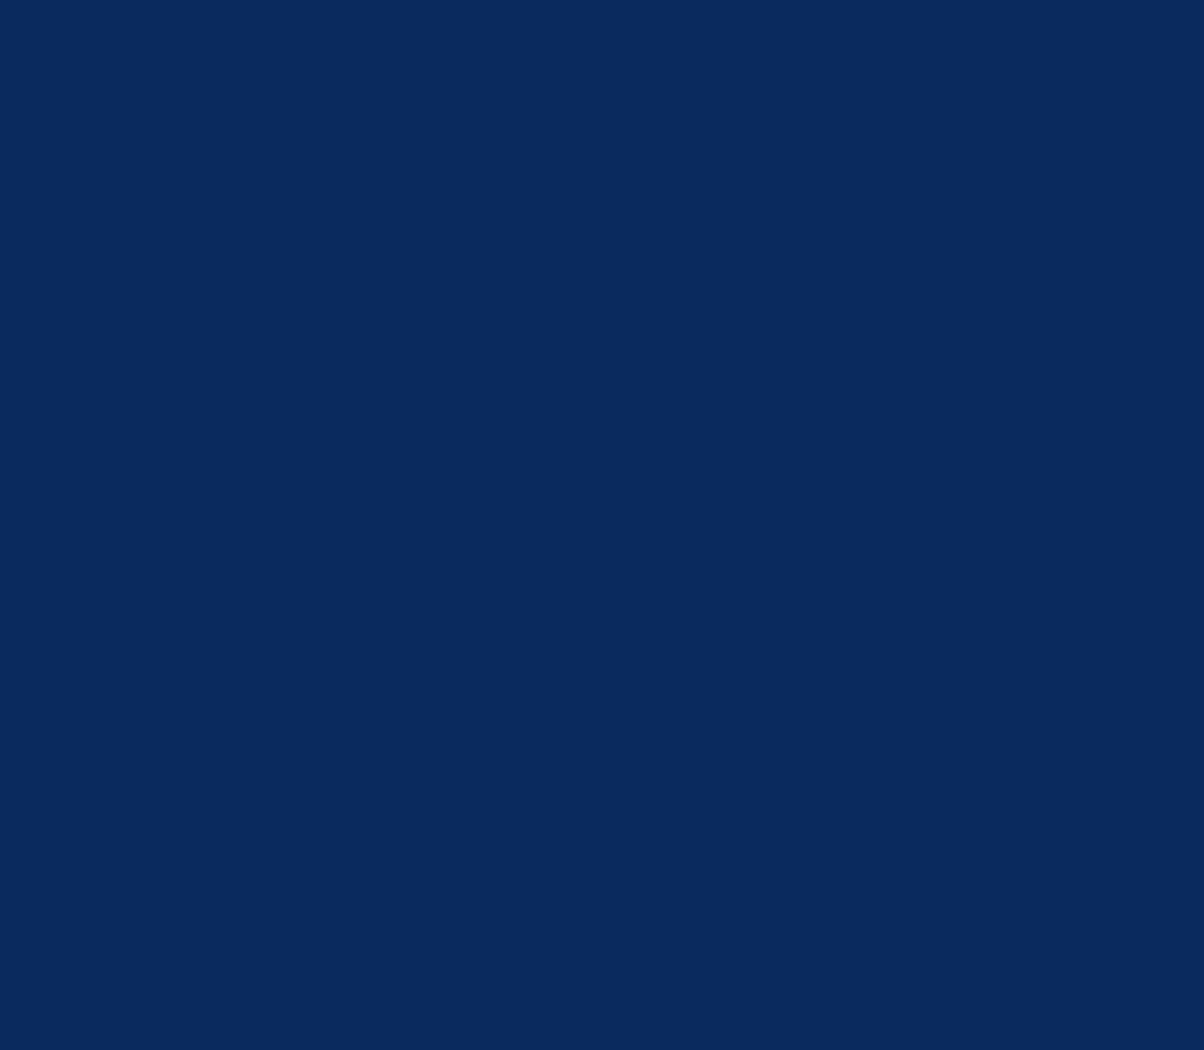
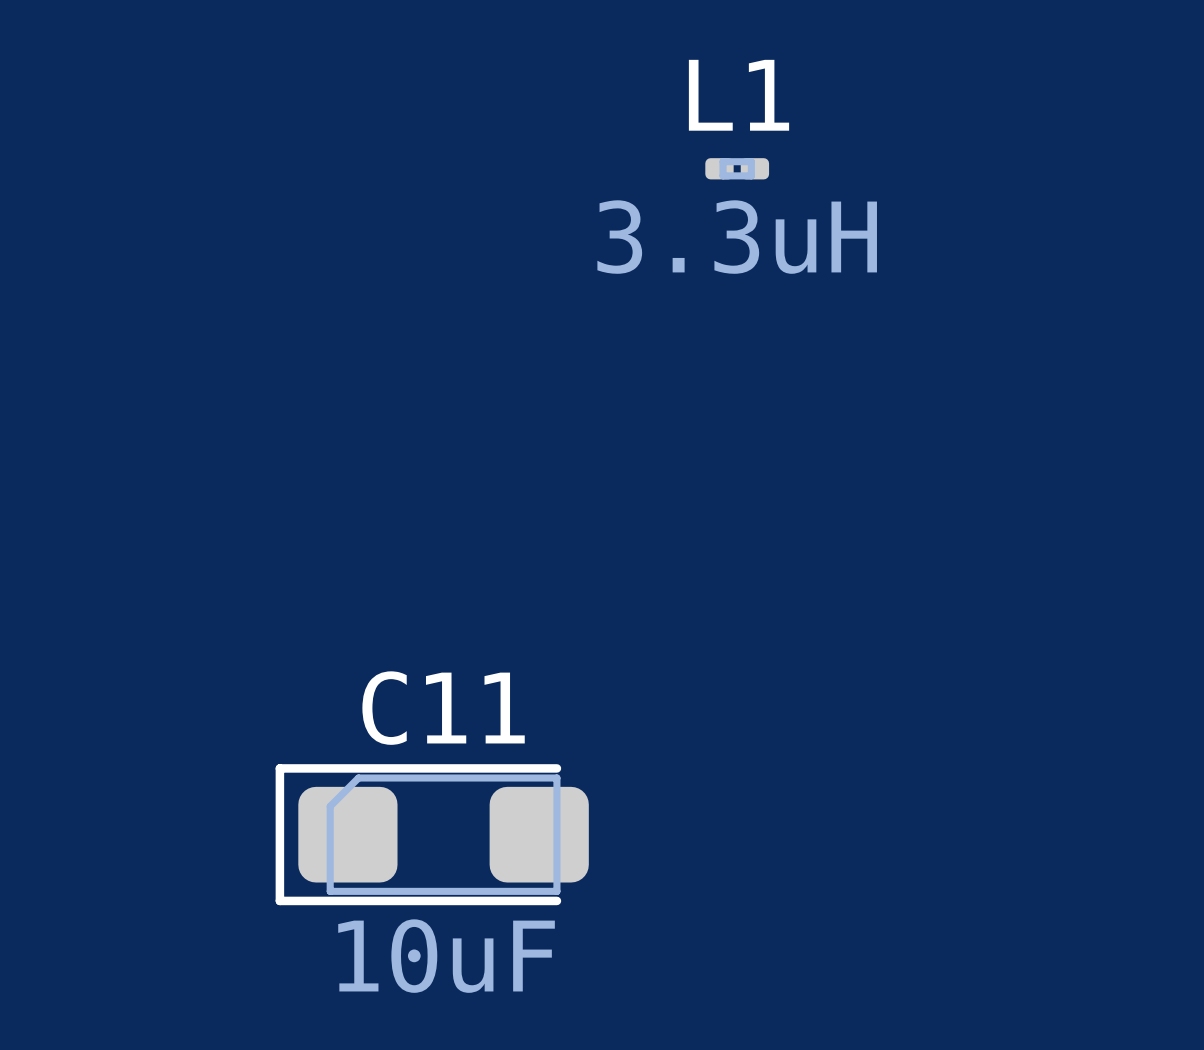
L1: none -> 3.3uH (737, 168)
C11: none -> 10uF (432, 834)

